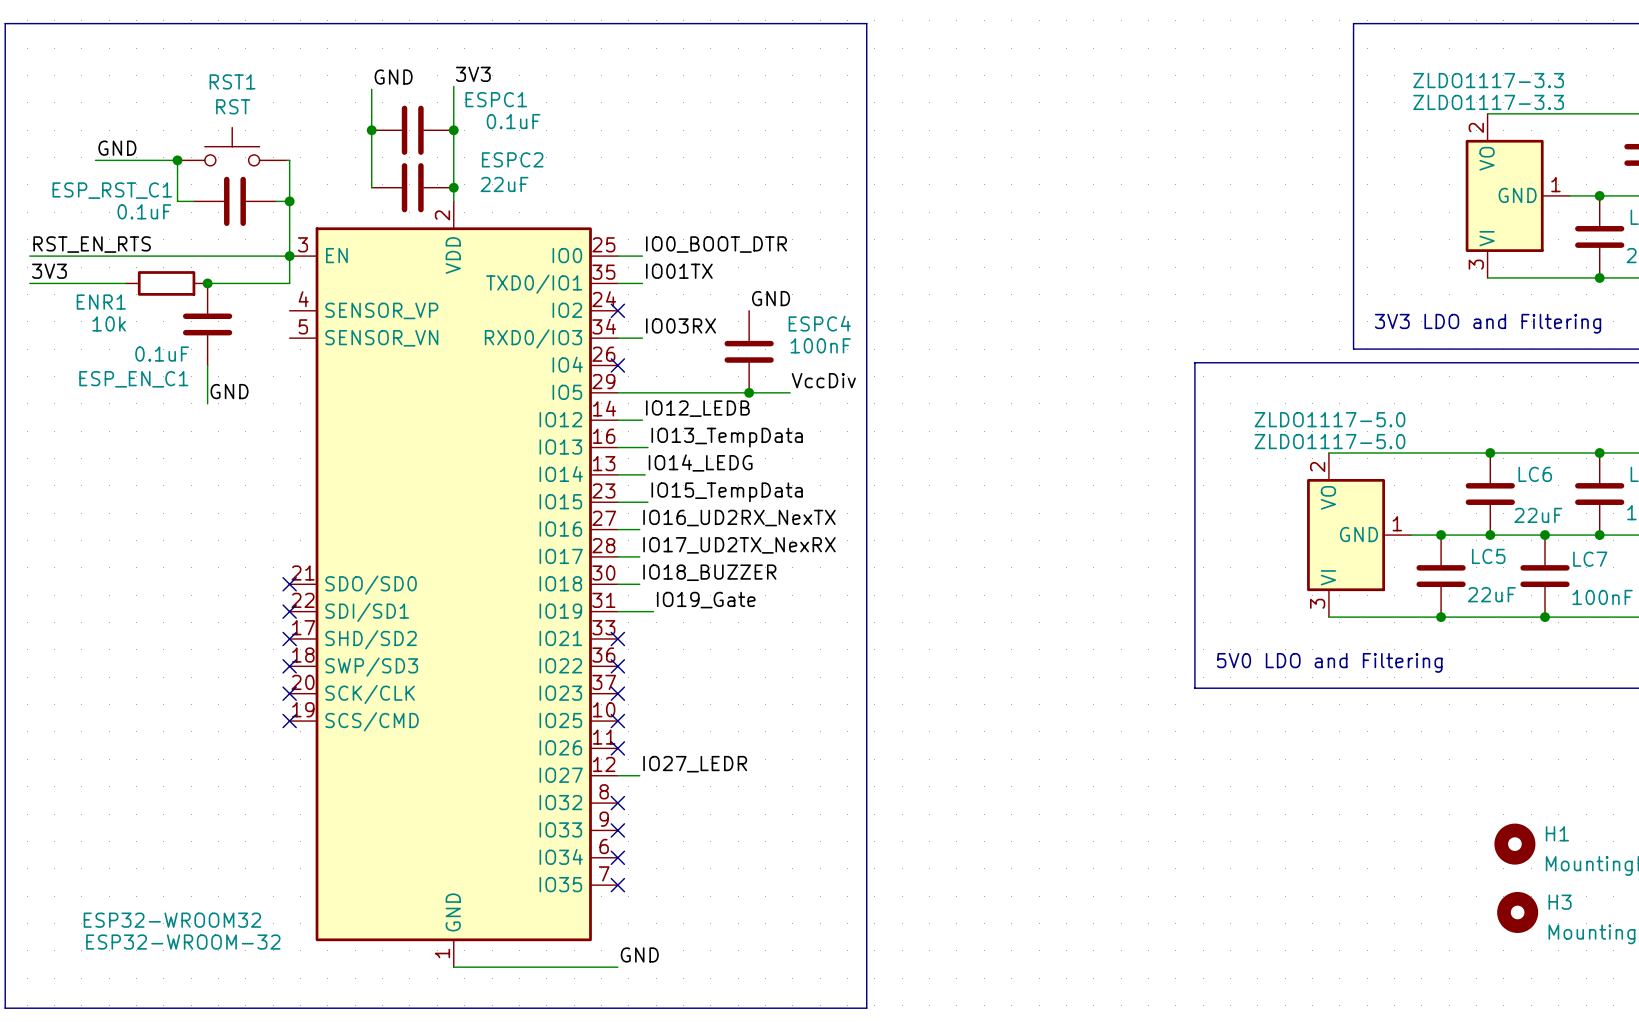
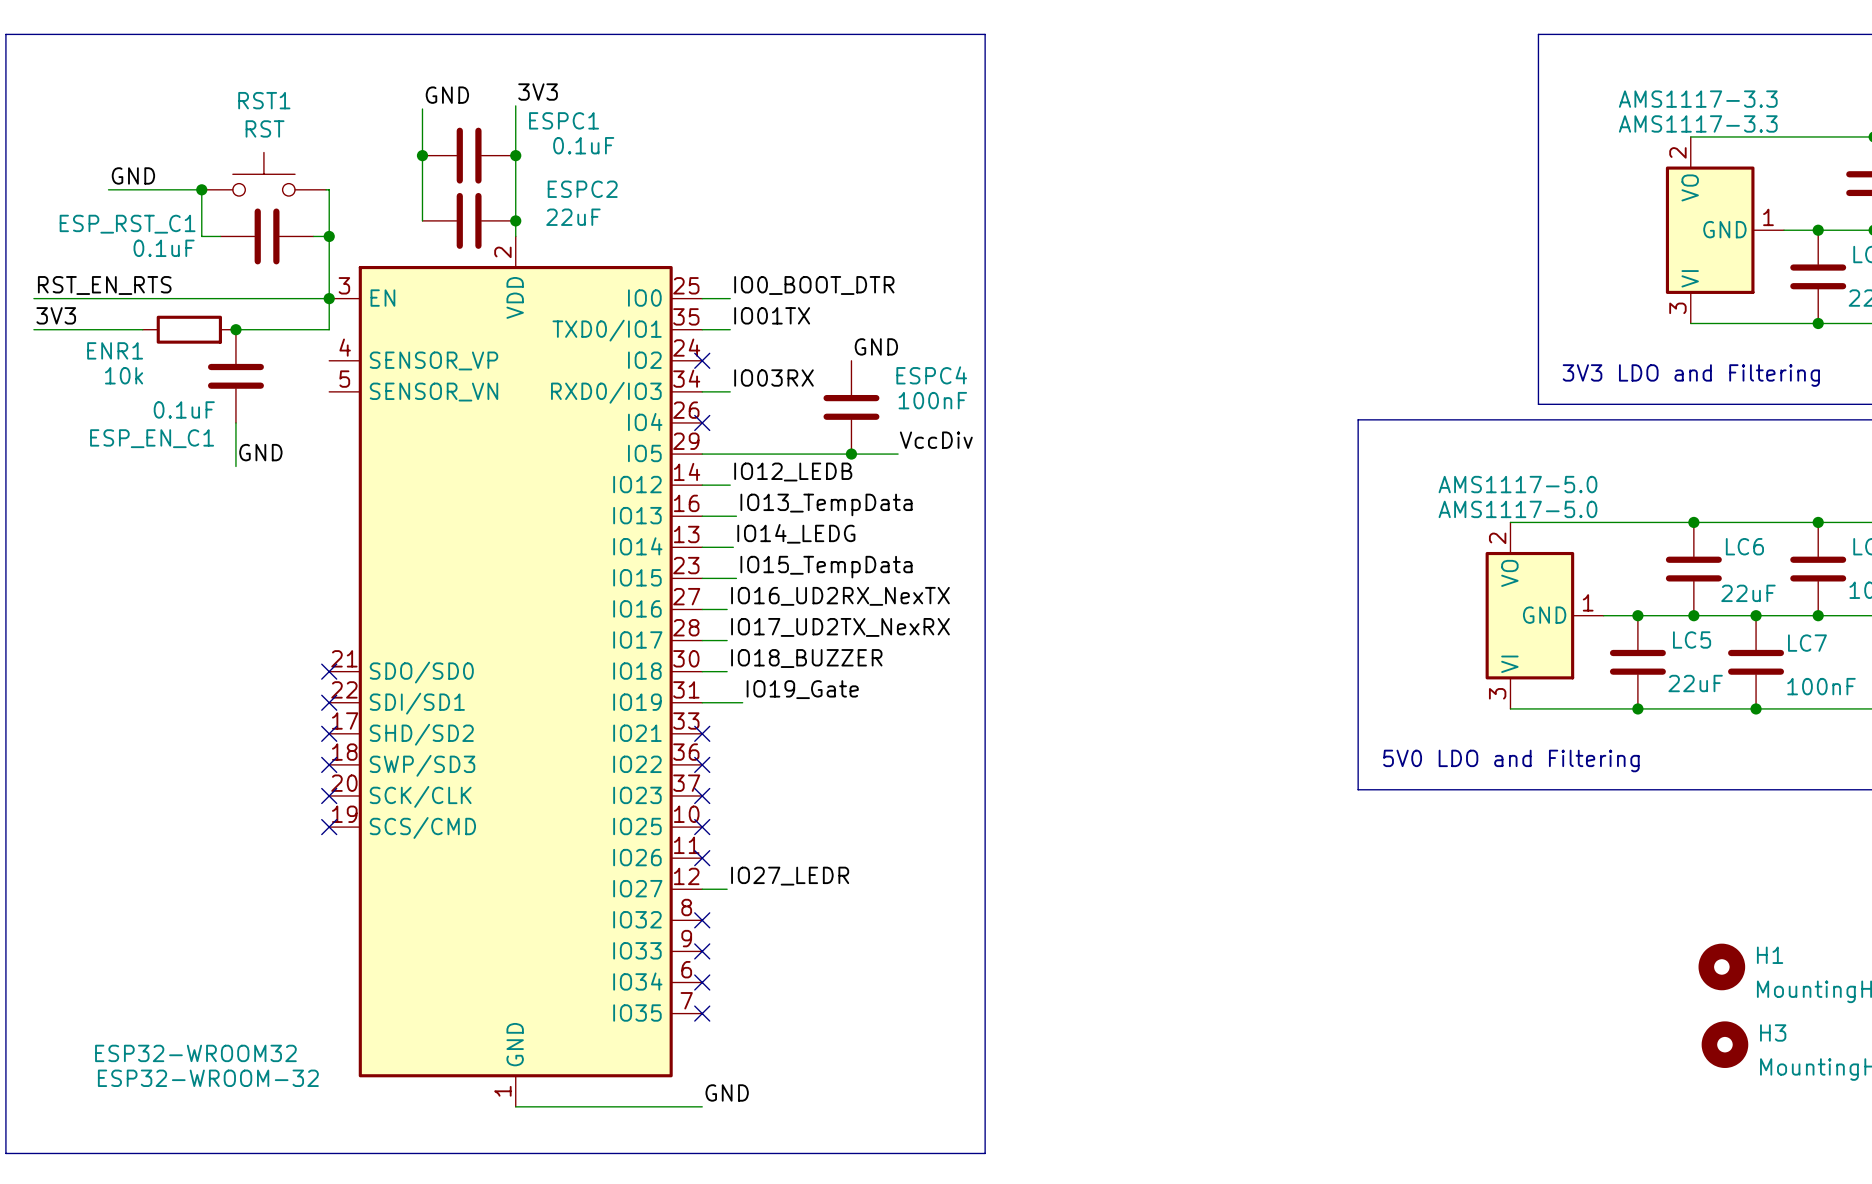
ZLDO1117-3.3 value: ZLDO1117-3.3 (1488, 80) -> AMS1117-3.3 (1698, 99)
ZLDO1117-3.3 name: ZLDO1117-3.3 (1488, 102) -> AMS1117-3.3 (1698, 123)
ZLDO1117-5.0 value: ZLDO1117-5.0 (1330, 419) -> AMS1117-5.0 (1517, 484)
ZLDO1117-5.0 name: ZLDO1117-5.0 (1330, 441) -> AMS1117-5.0 (1517, 509)

